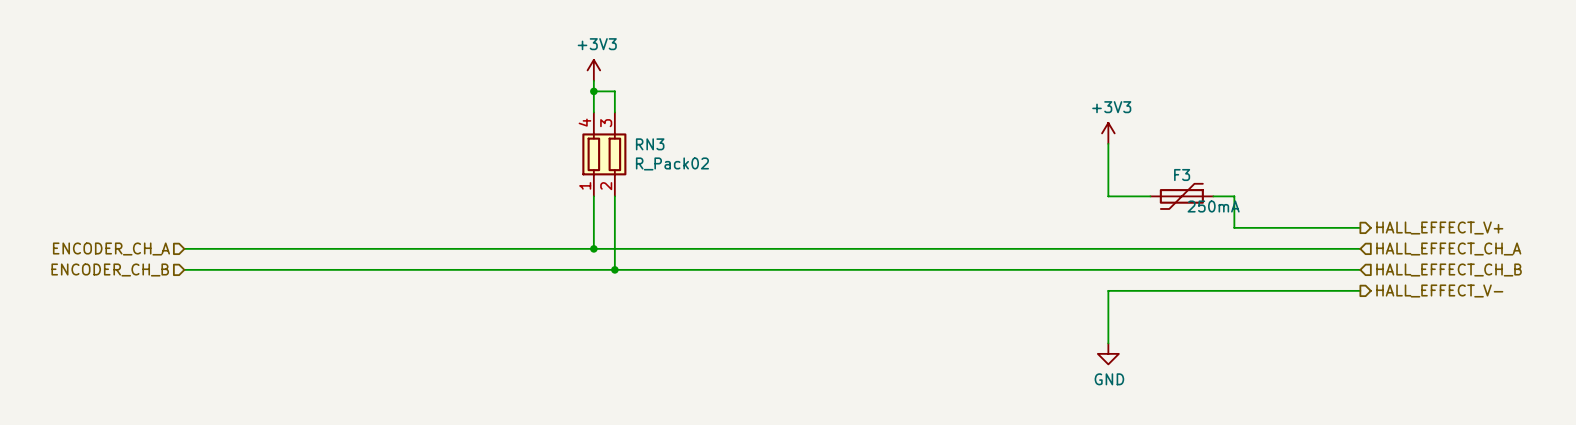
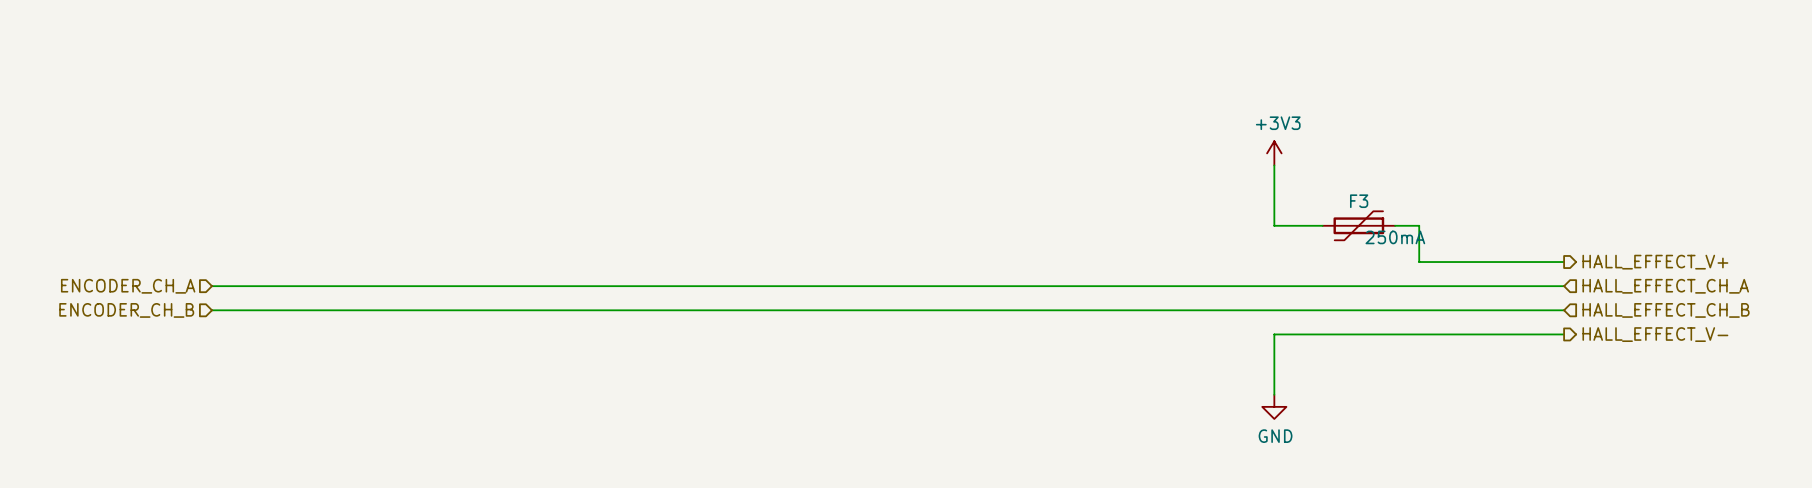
power symbol: +3V3 (593, 70) -> none
wire: (593, 80) (593, 112) -> none
wire: (593, 91) (614, 91) (614, 112) -> none
junction: (593, 91) -> none
RN3: R_Pack02 (604, 154) -> none
wire: (593, 196) (593, 248) -> none
wire: (614, 196) (614, 269) -> none
junction: (593, 248) -> none
junction: (614, 269) -> none

